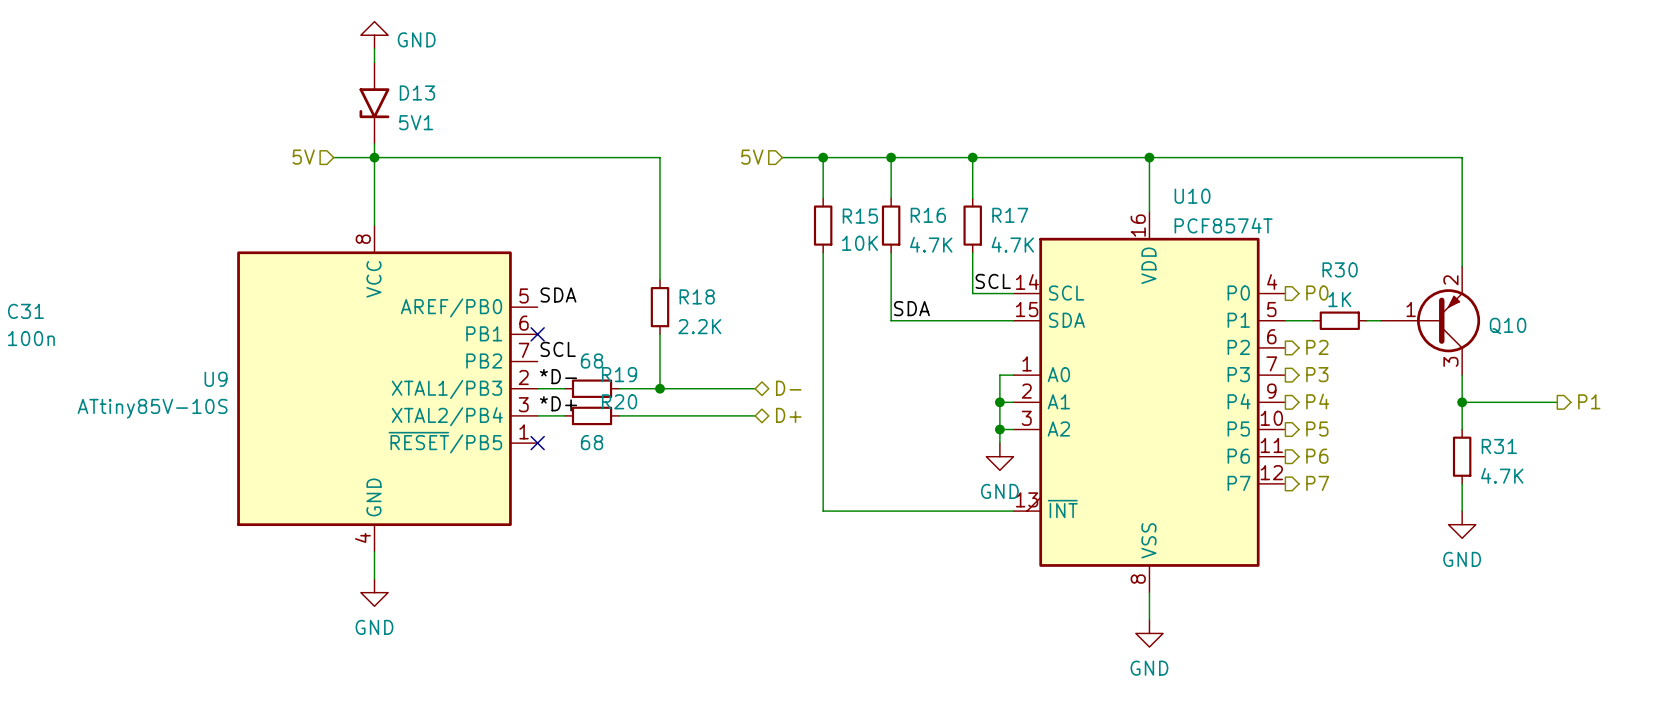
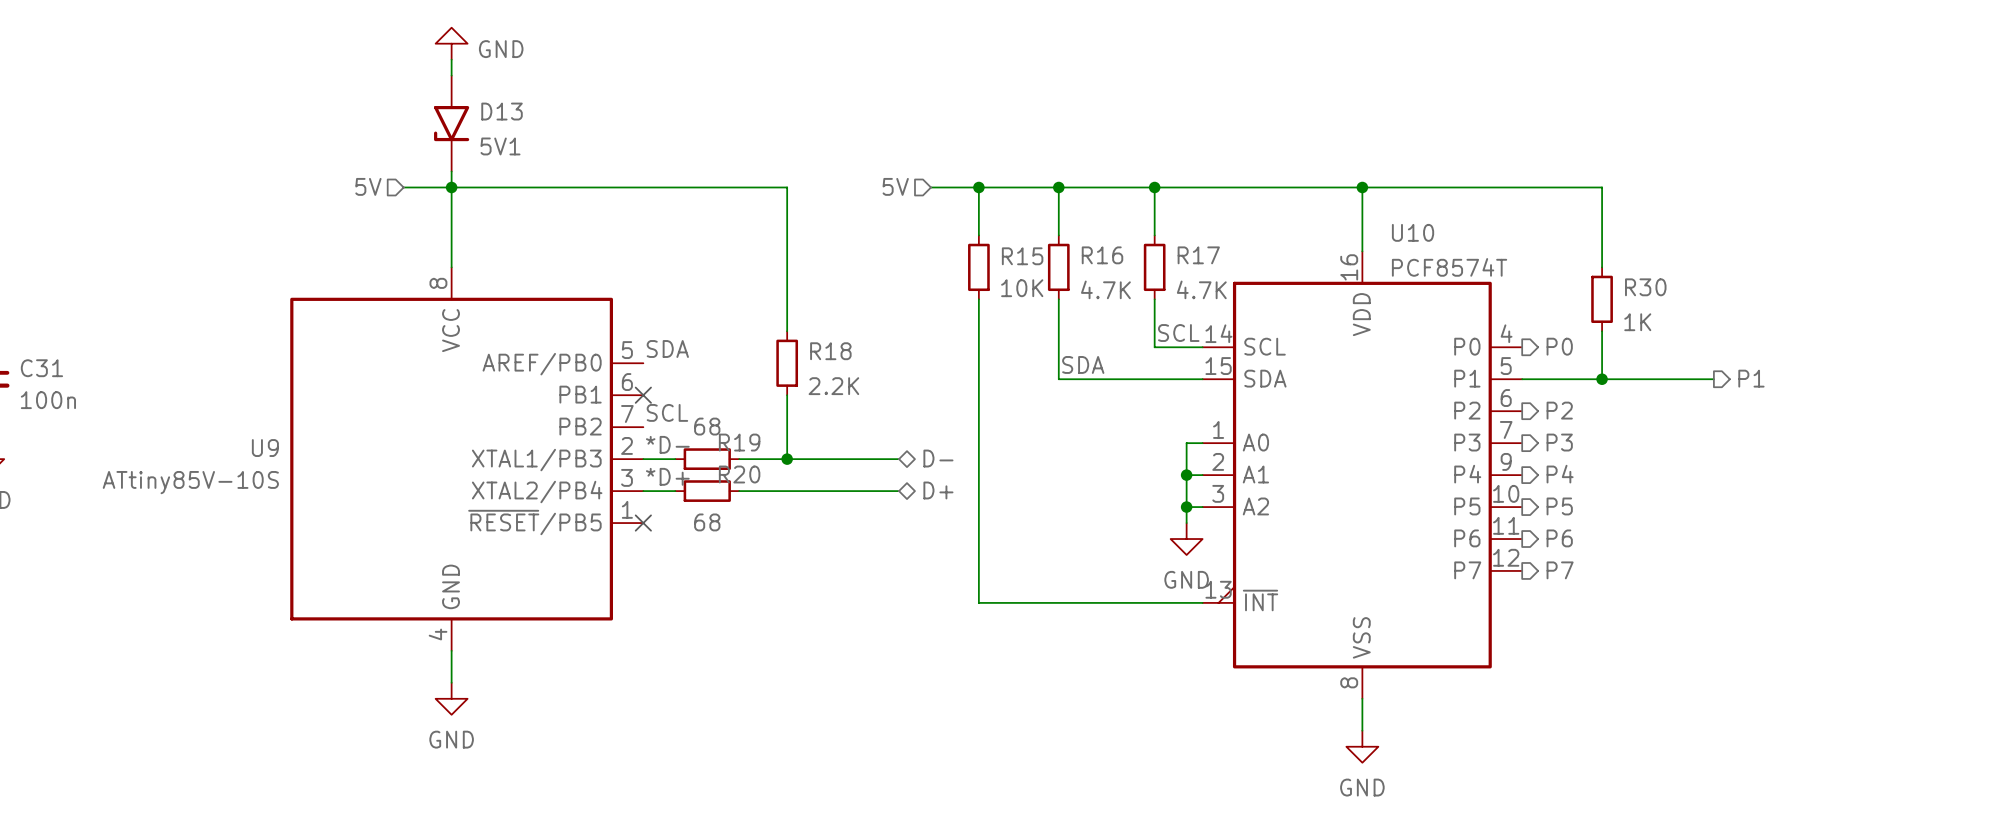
wire: (1353, 157) (1462, 157) (1462, 266) -> (1602, 187) (1602, 267)
wire: none -> (1602, 331) (1602, 379)
R30 value position: 1K (1339, 299) -> 1K (1637, 322)
wire: none -> (1554, 379) (1618, 379)
R30 rotation: 0° (1339, 320) -> 90° clockwise (1602, 299)
R30 position: (1339, 320) -> (1602, 299)
junction: none -> (1602, 379)
Q10: (1430, 320) -> none
wire: (1462, 375) (1462, 429) -> none
hierarchical label position: P1 (1589, 401) -> P1 (1751, 378)
wire: (1462, 402) (1557, 402) -> none
junction: (1462, 402) -> none
R31: 4.7K (1462, 456) -> none
wire: (1462, 483) (1462, 511) -> none
power symbol: GND (1462, 524) -> none

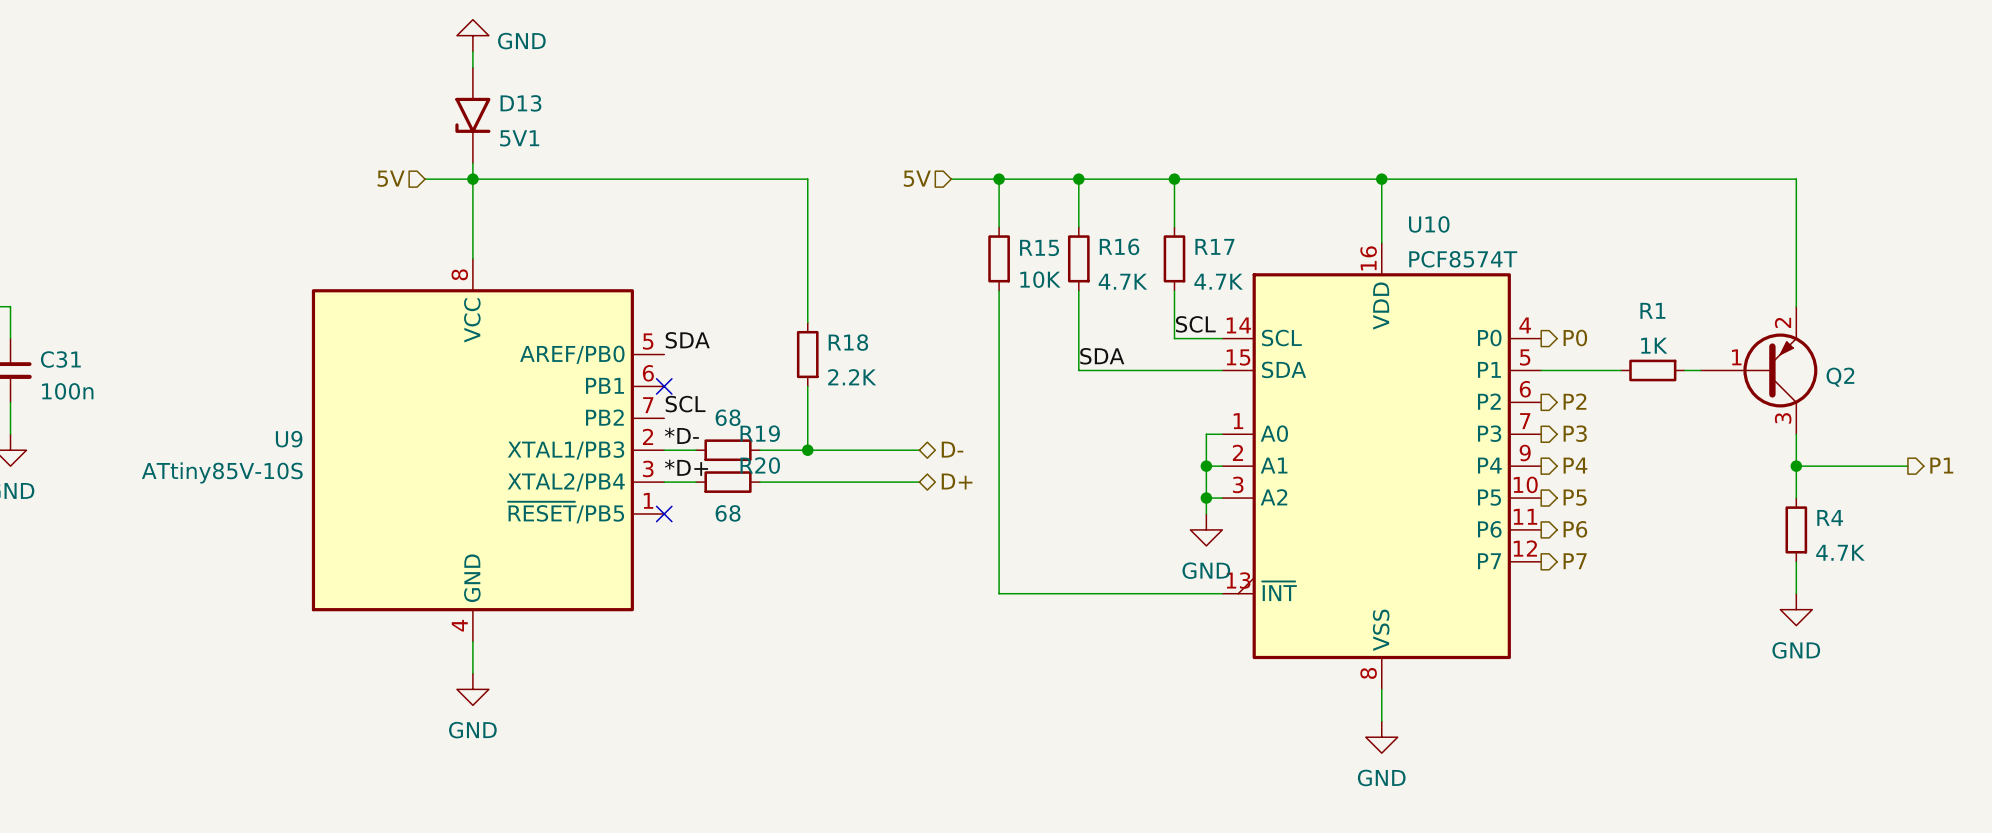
wire: (1602, 187) (1602, 267) -> (1620, 179) (1796, 179) (1796, 306)
R30: 1K (1602, 299) -> none
wire: (1602, 331) (1602, 379) (1665, 379) -> none
hierarchical label position: P1 (1751, 378) -> P1 (1941, 465)
junction: (1602, 379) -> none
R1: none -> 1K (1652, 370)
Q2: none -> (1759, 370)
wire: none -> (1796, 434) (1796, 498)
wire: none -> (1796, 466) (1907, 466)
junction: none -> (1796, 466)
R4: none -> 4.7K (1796, 529)
wire: none -> (1796, 561) (1796, 593)
power symbol: none -> GND (1796, 609)

